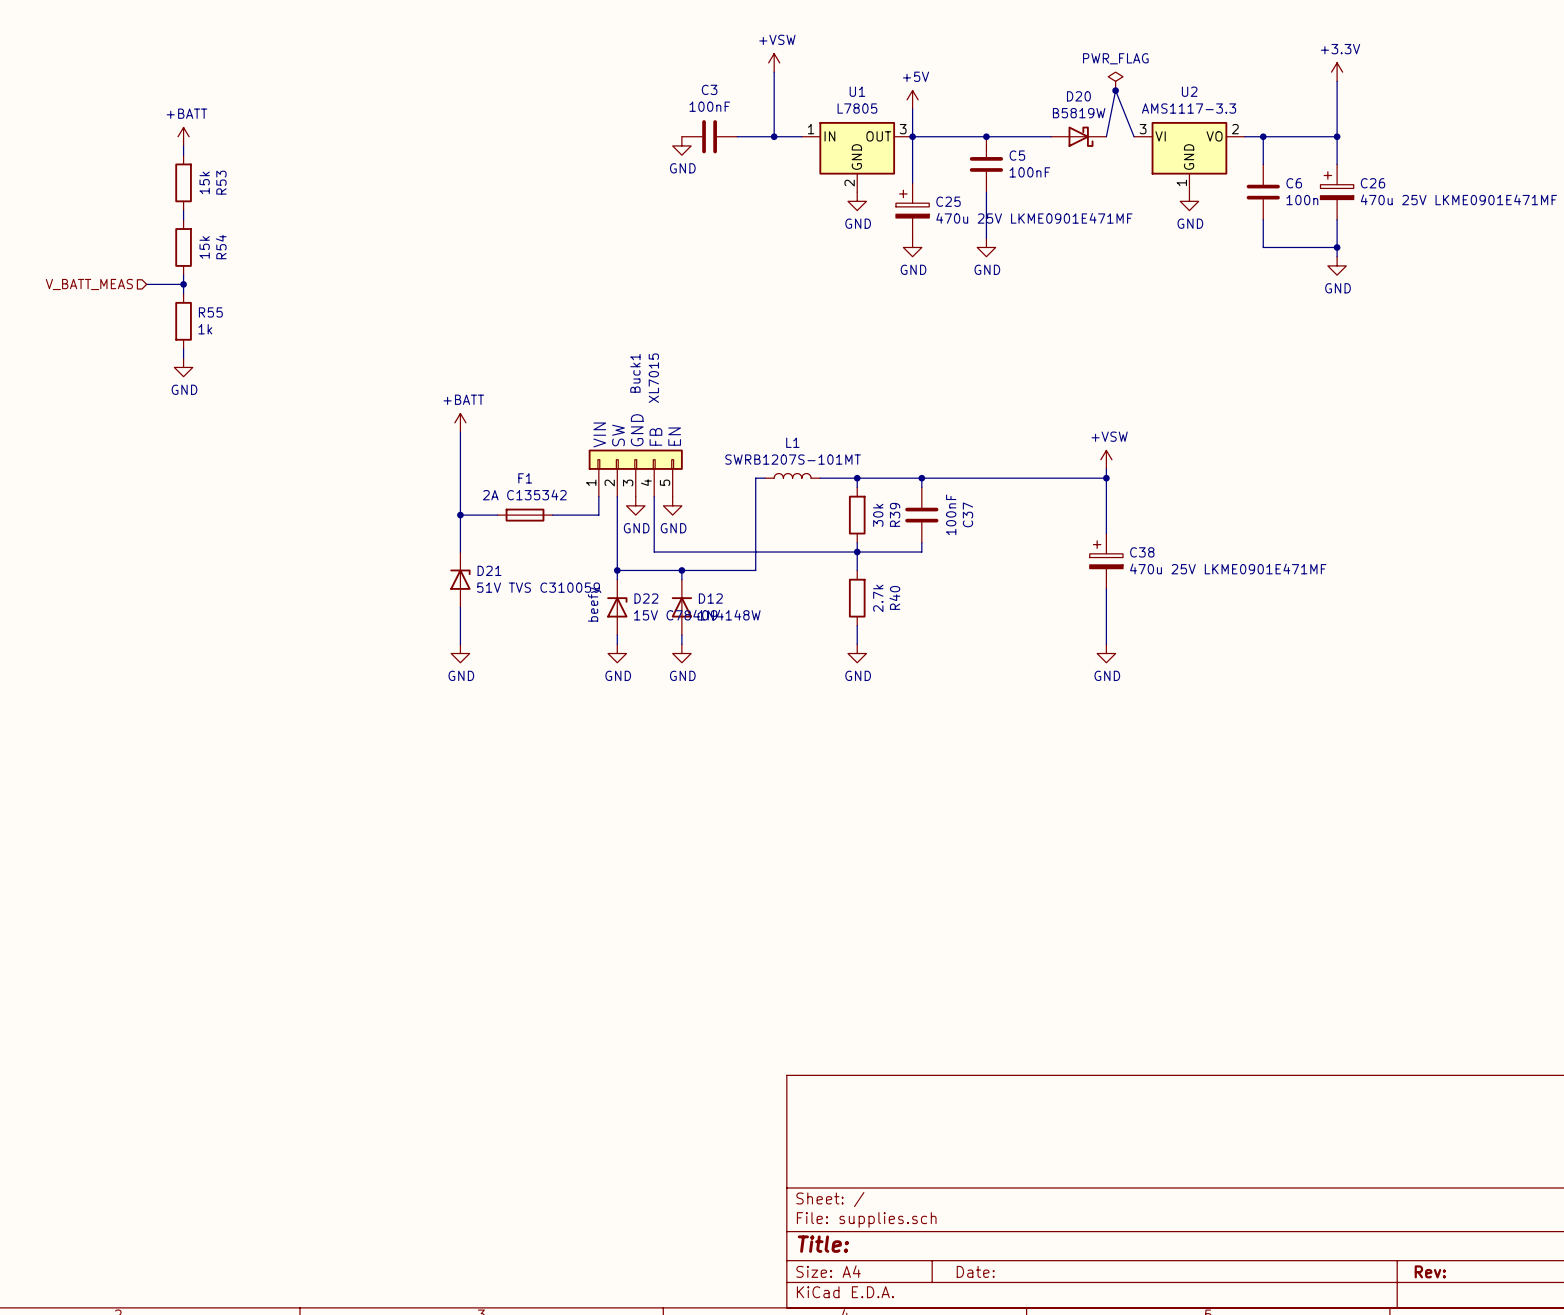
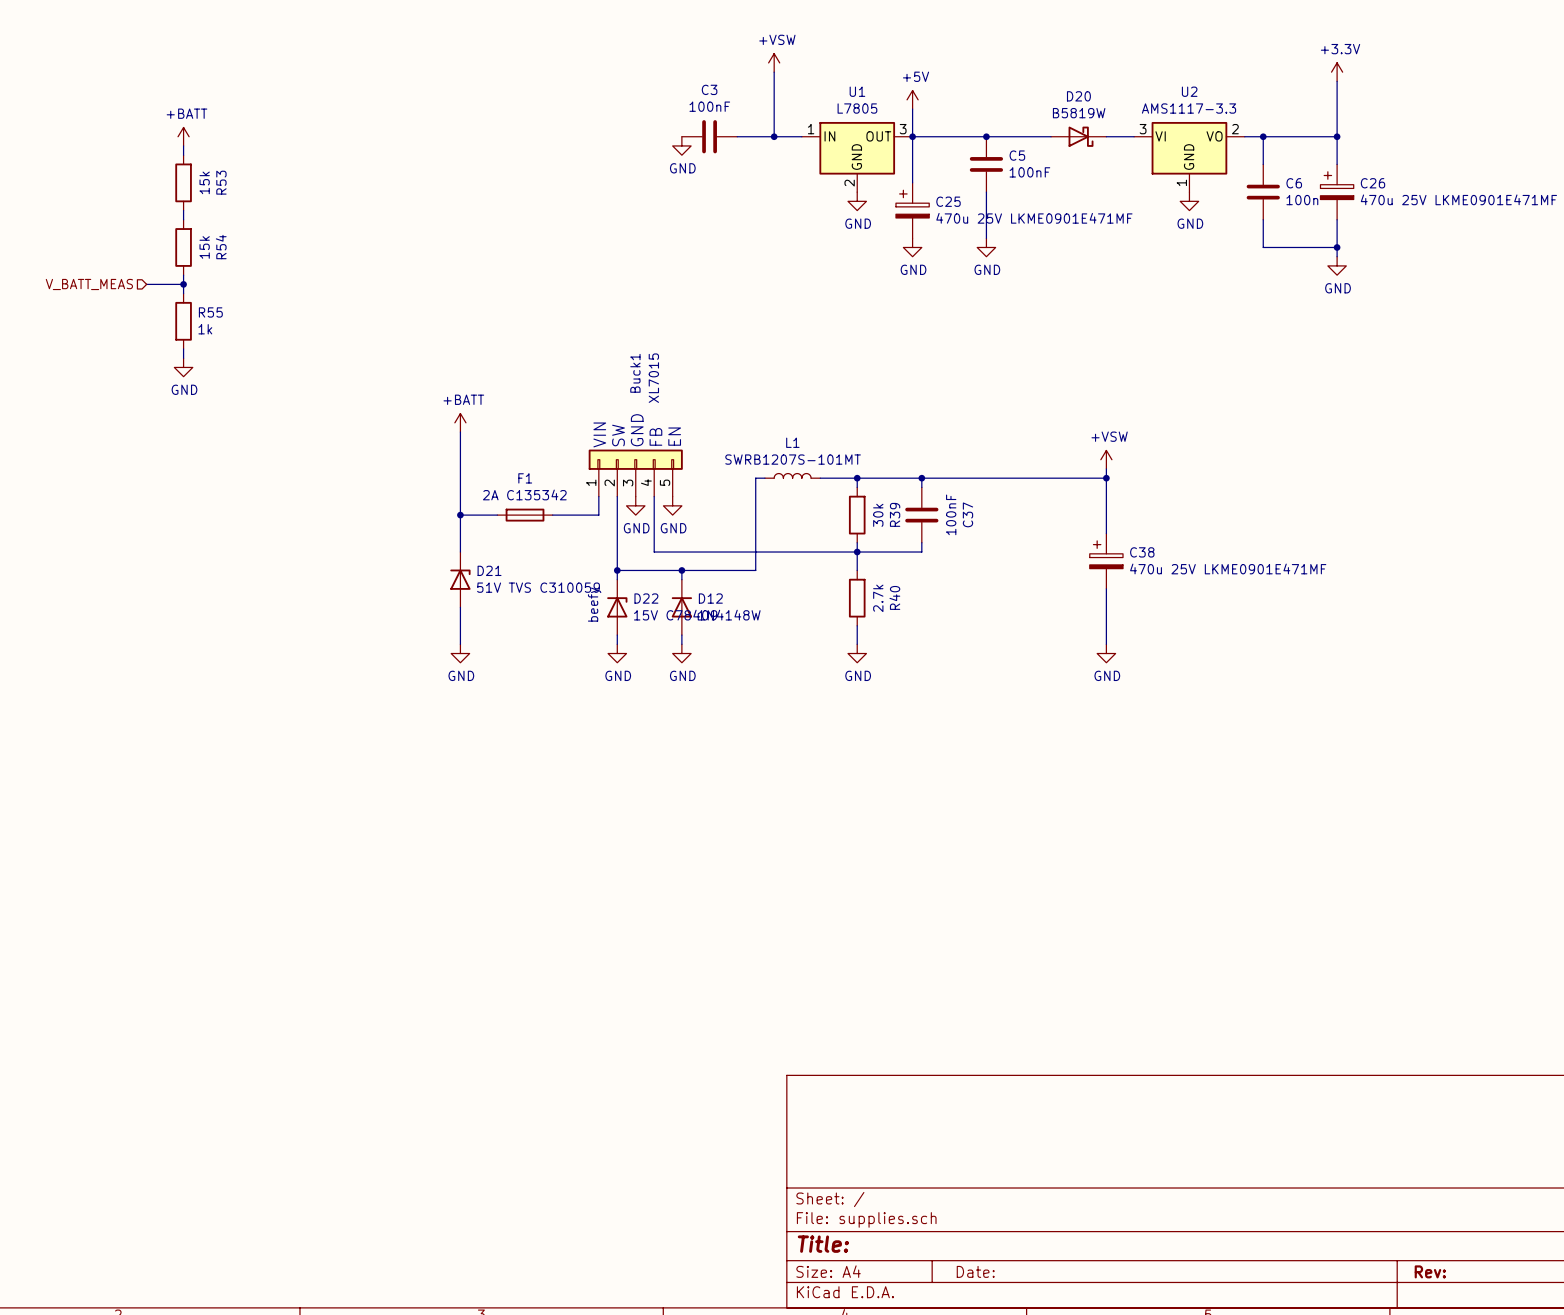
power symbol: PWR_FLAG (1115, 81) -> none
junction: (1115, 90) -> none
wire: (1106, 136) (1115, 90) (1134, 136) -> (1106, 136) (1134, 136)

